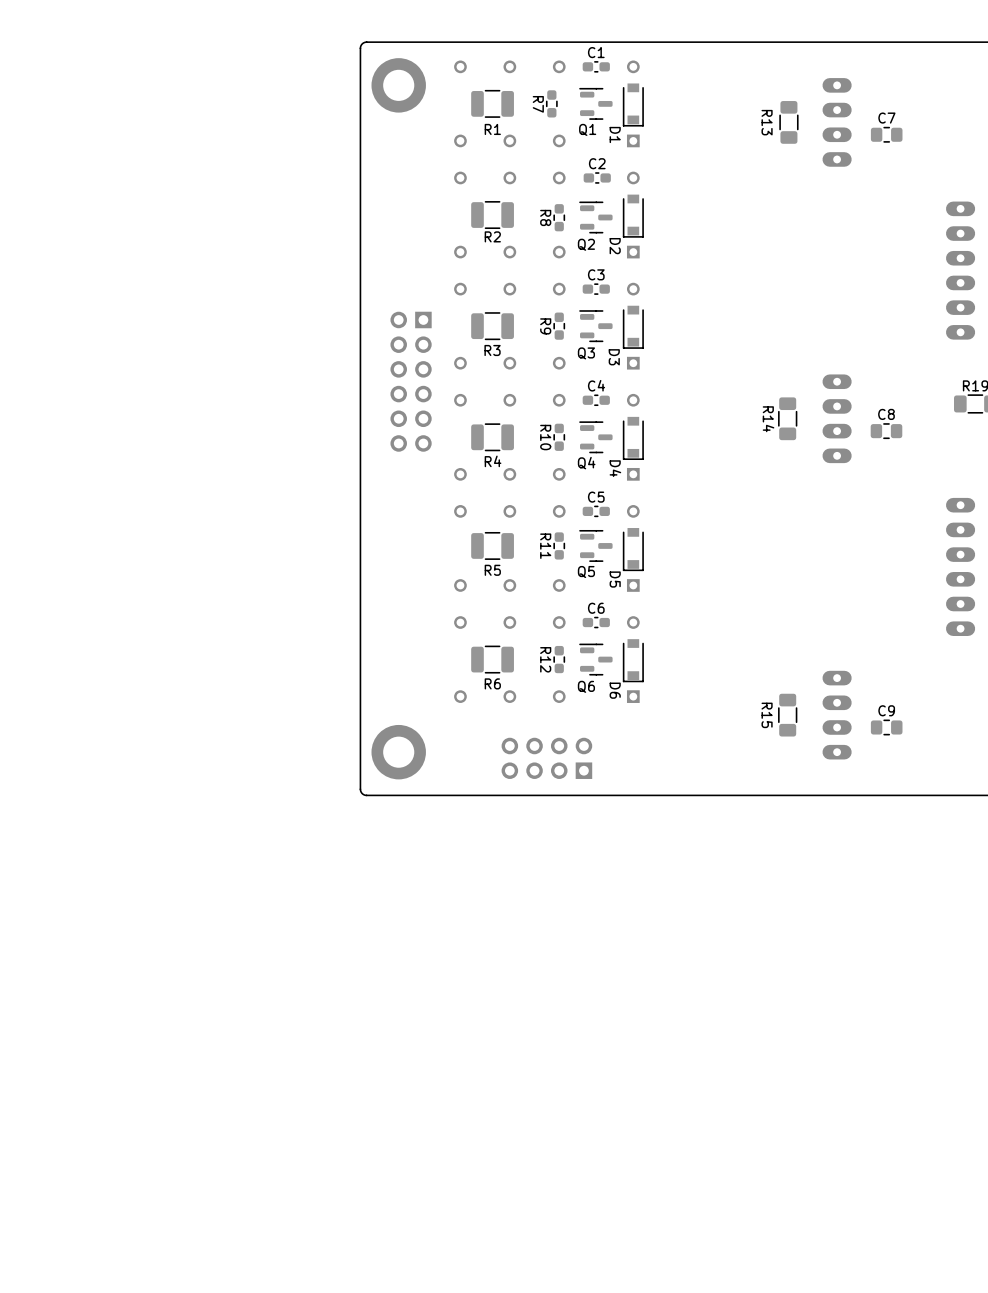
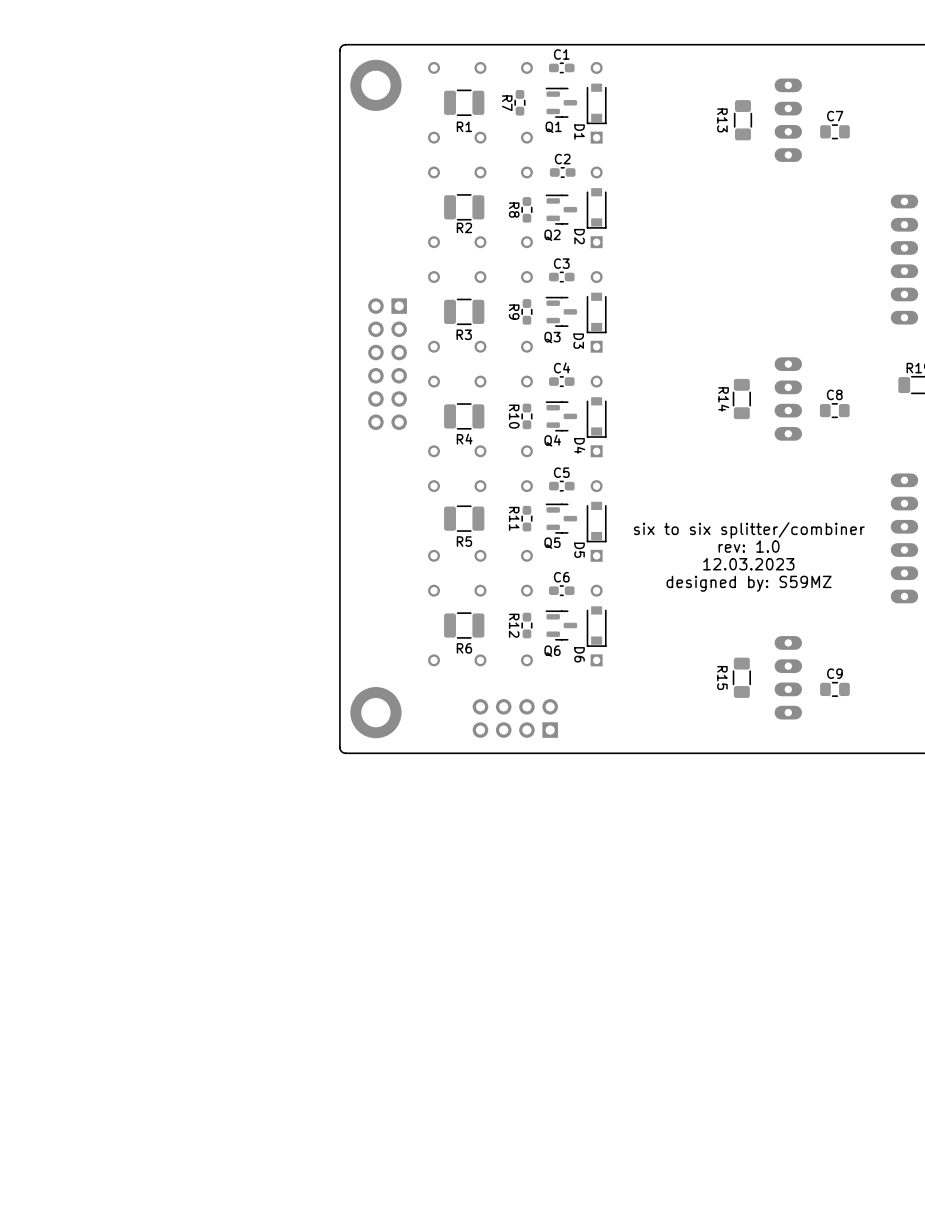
text: none -> six to six splitter/combiner (749, 530)
text: none -> rev: 1.0 (749, 546)
text: none -> 12.03.2023 (748, 564)
text: none -> designed by: S59MZ (749, 583)

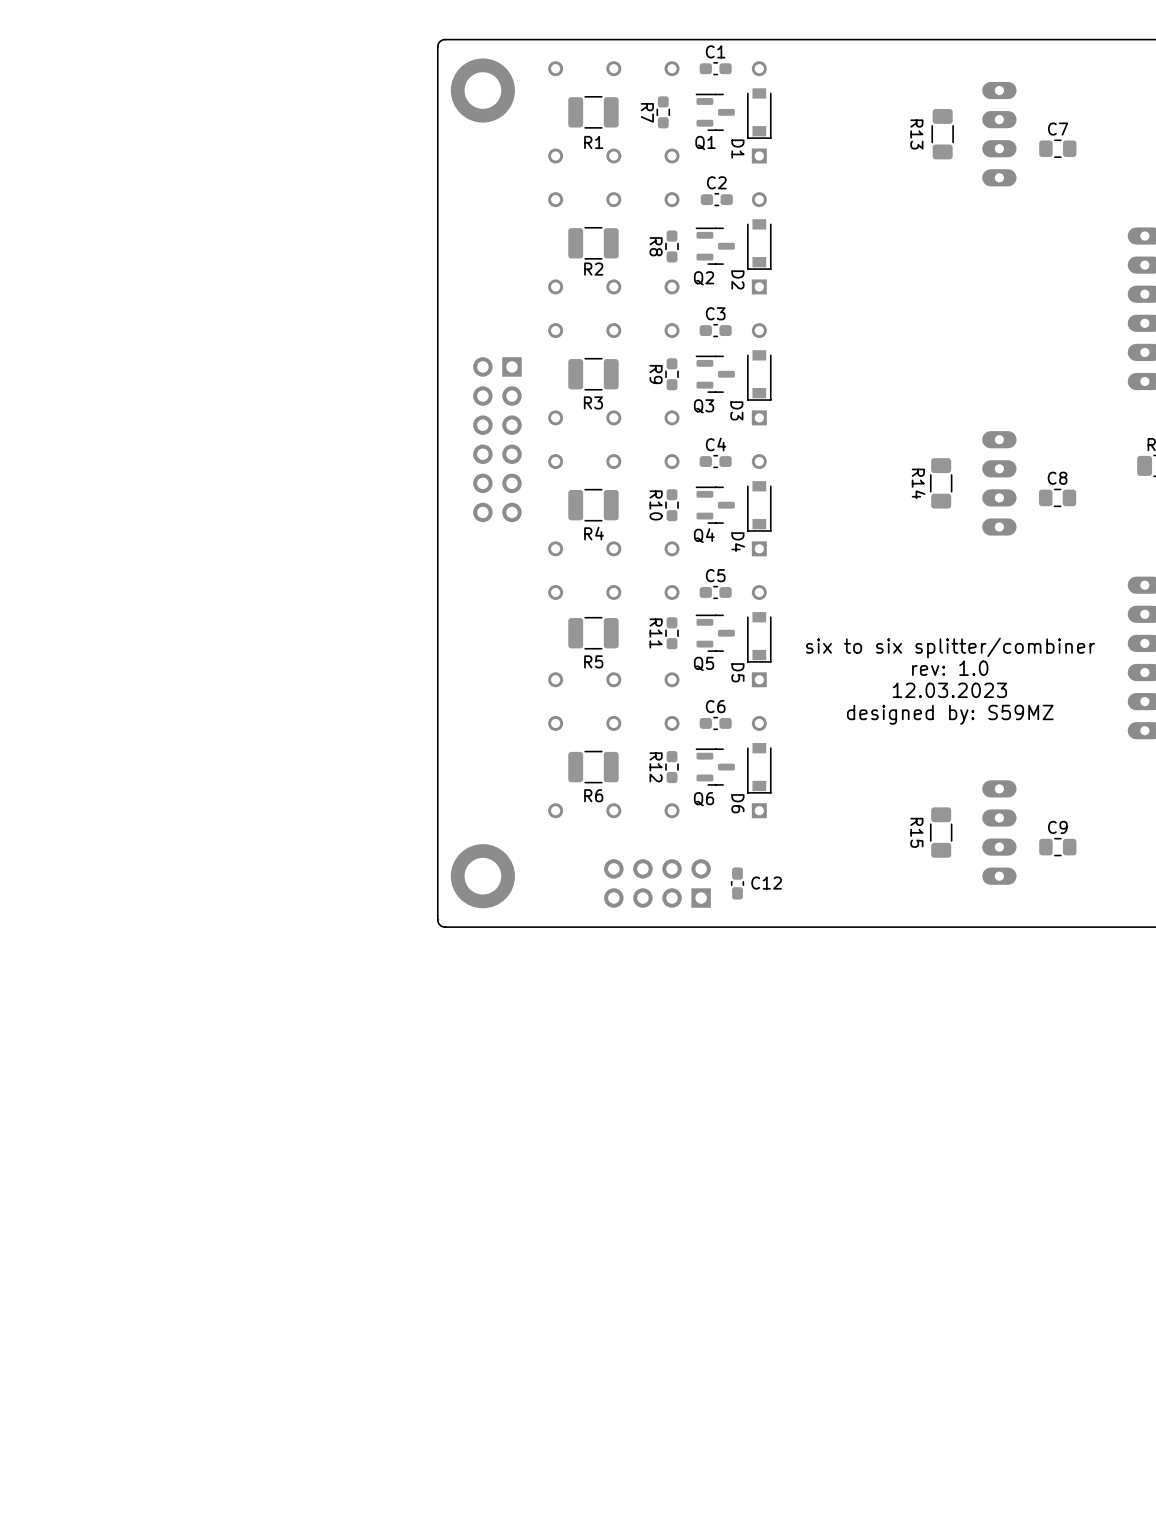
C12: none -> (737, 883)

